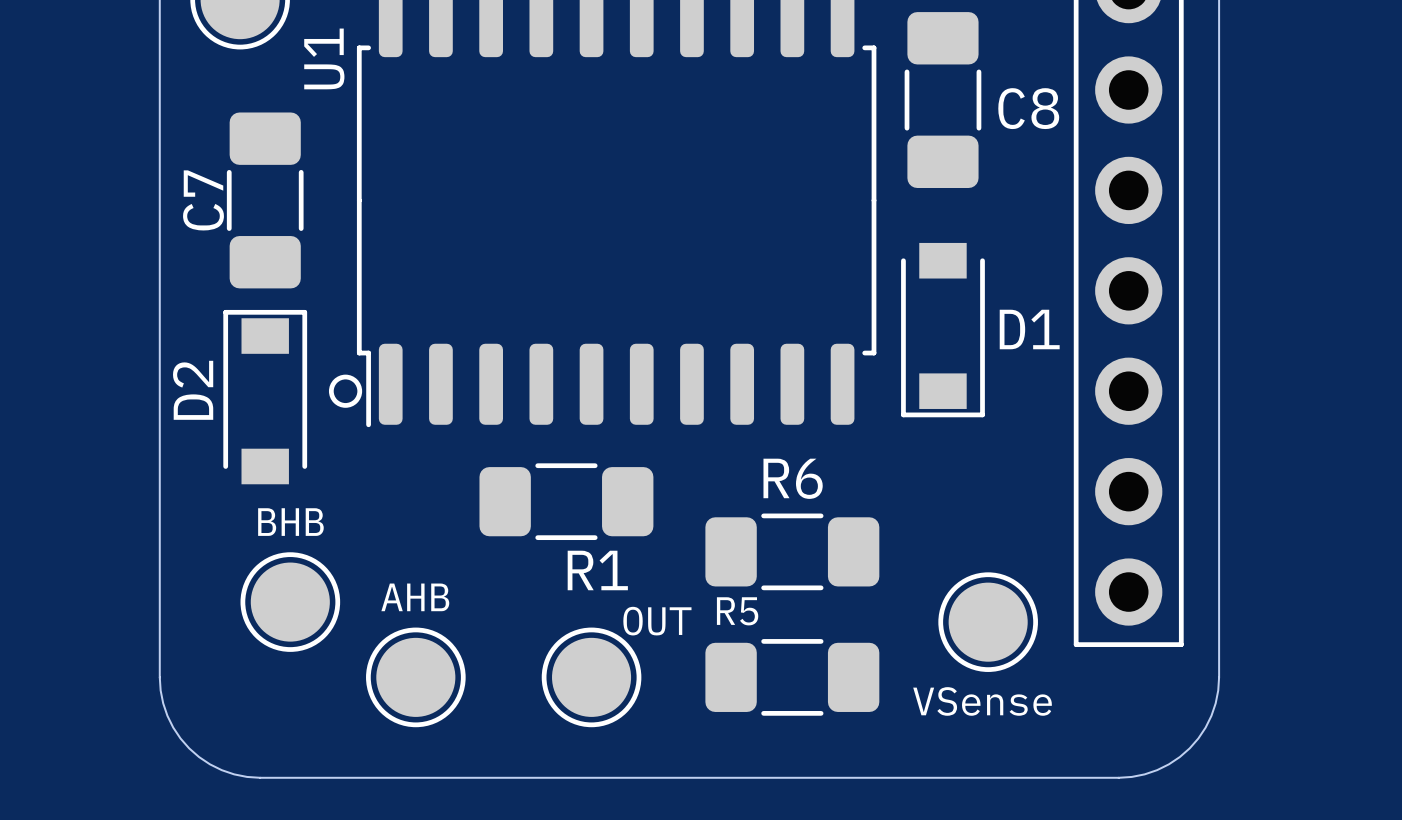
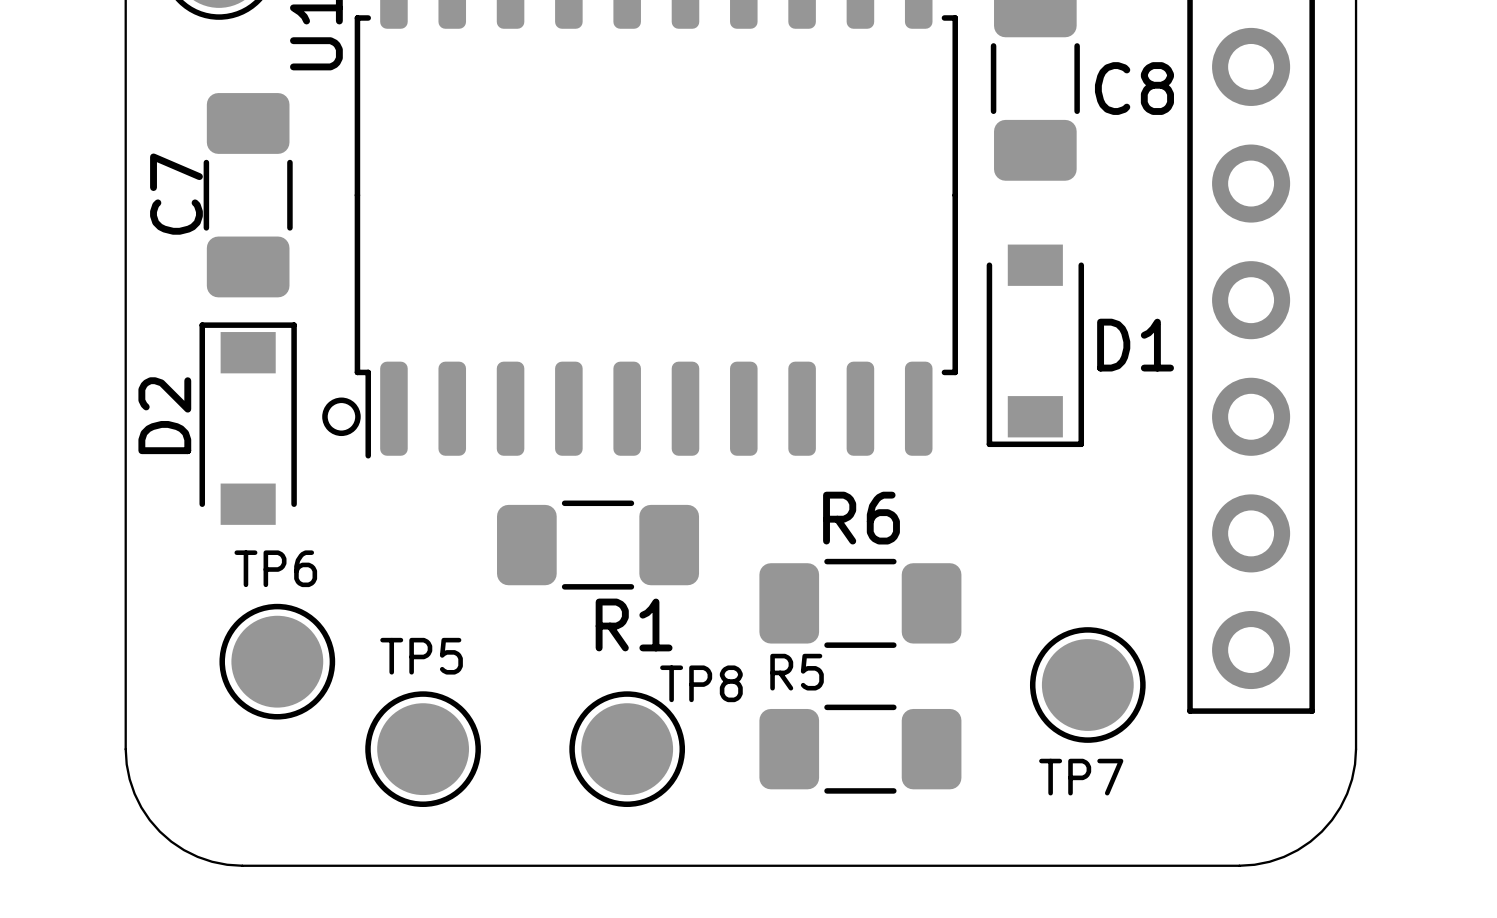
BHB name: BHB (290, 522) -> TP6 (275, 568)
AHB name: AHB (415, 597) -> TP5 (421, 656)
OUT name: OUT (657, 621) -> TP8 (701, 683)
VSense name: VSense (982, 701) -> TP7 (1081, 777)

